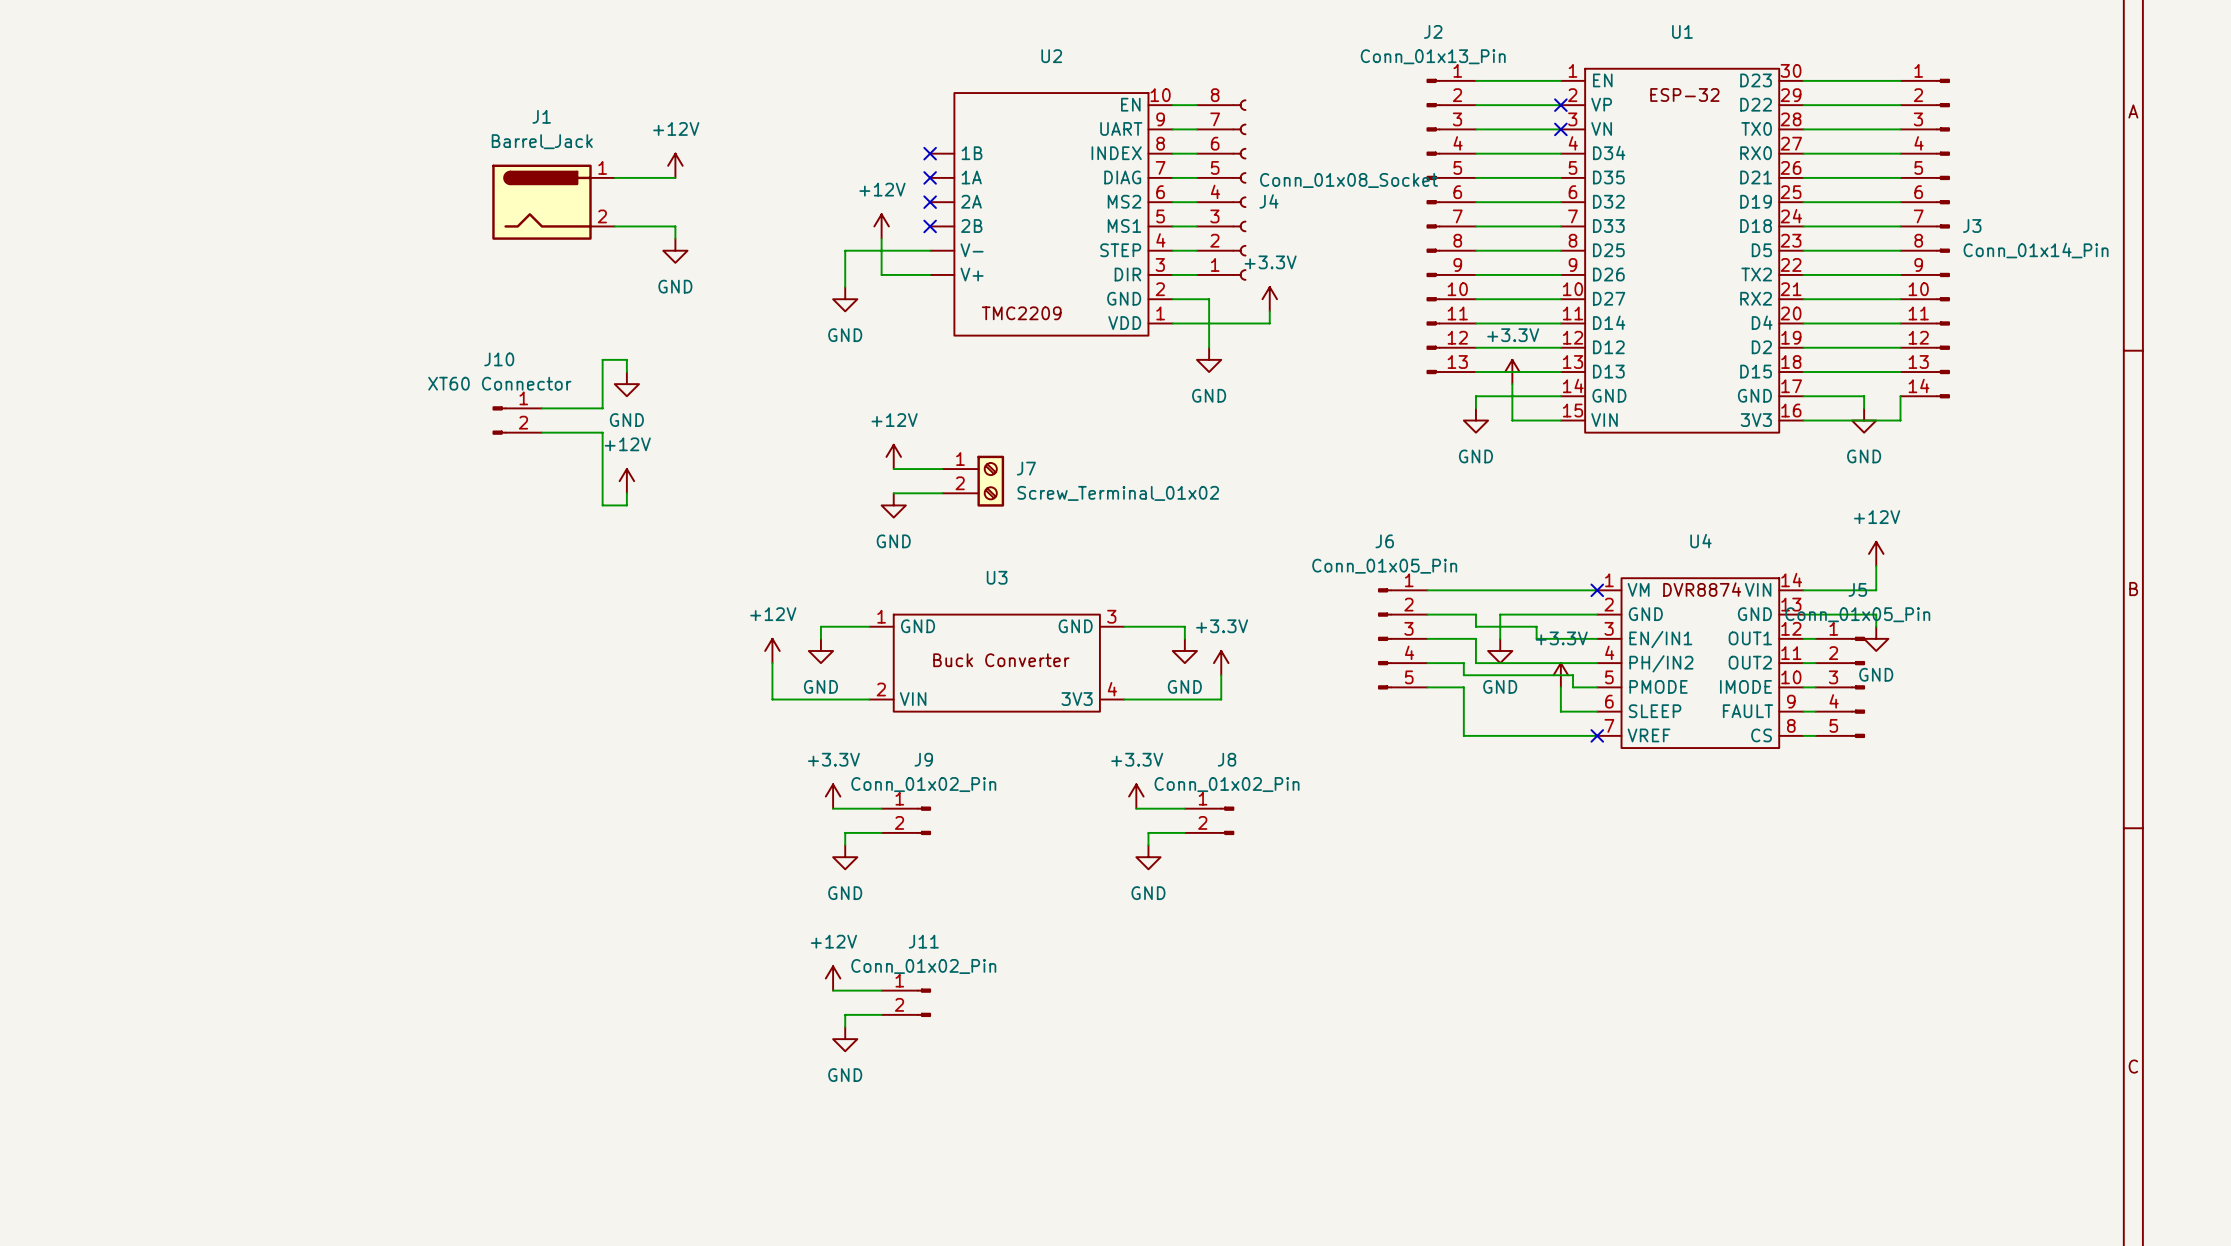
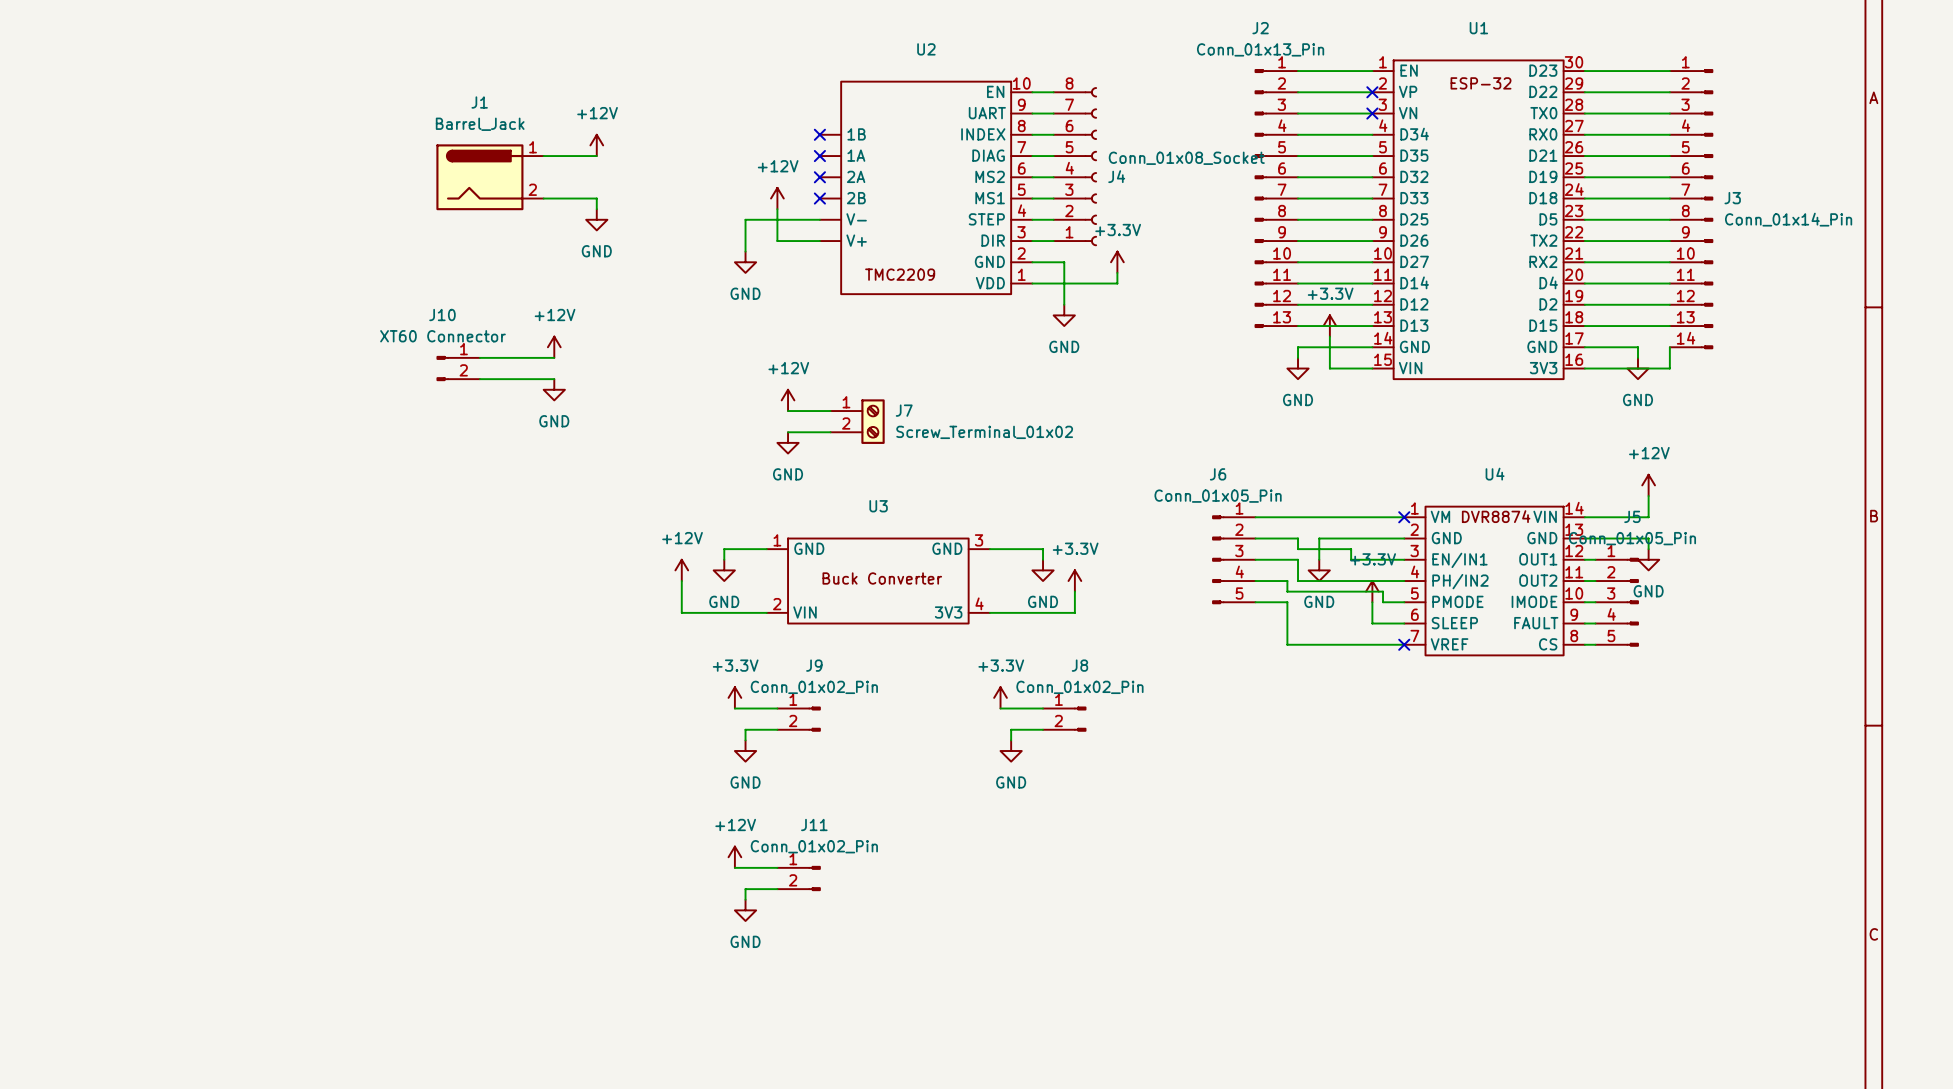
wire: (626, 372) (626, 359) (602, 359) (602, 408) -> (554, 357) (533, 357)
power symbol position: GND (626, 384) -> GND (554, 389)
wire: (602, 432) (602, 505) (626, 505) (626, 493) -> (533, 379) (554, 379)
power symbol position: +12V (626, 481) -> +12V (554, 347)

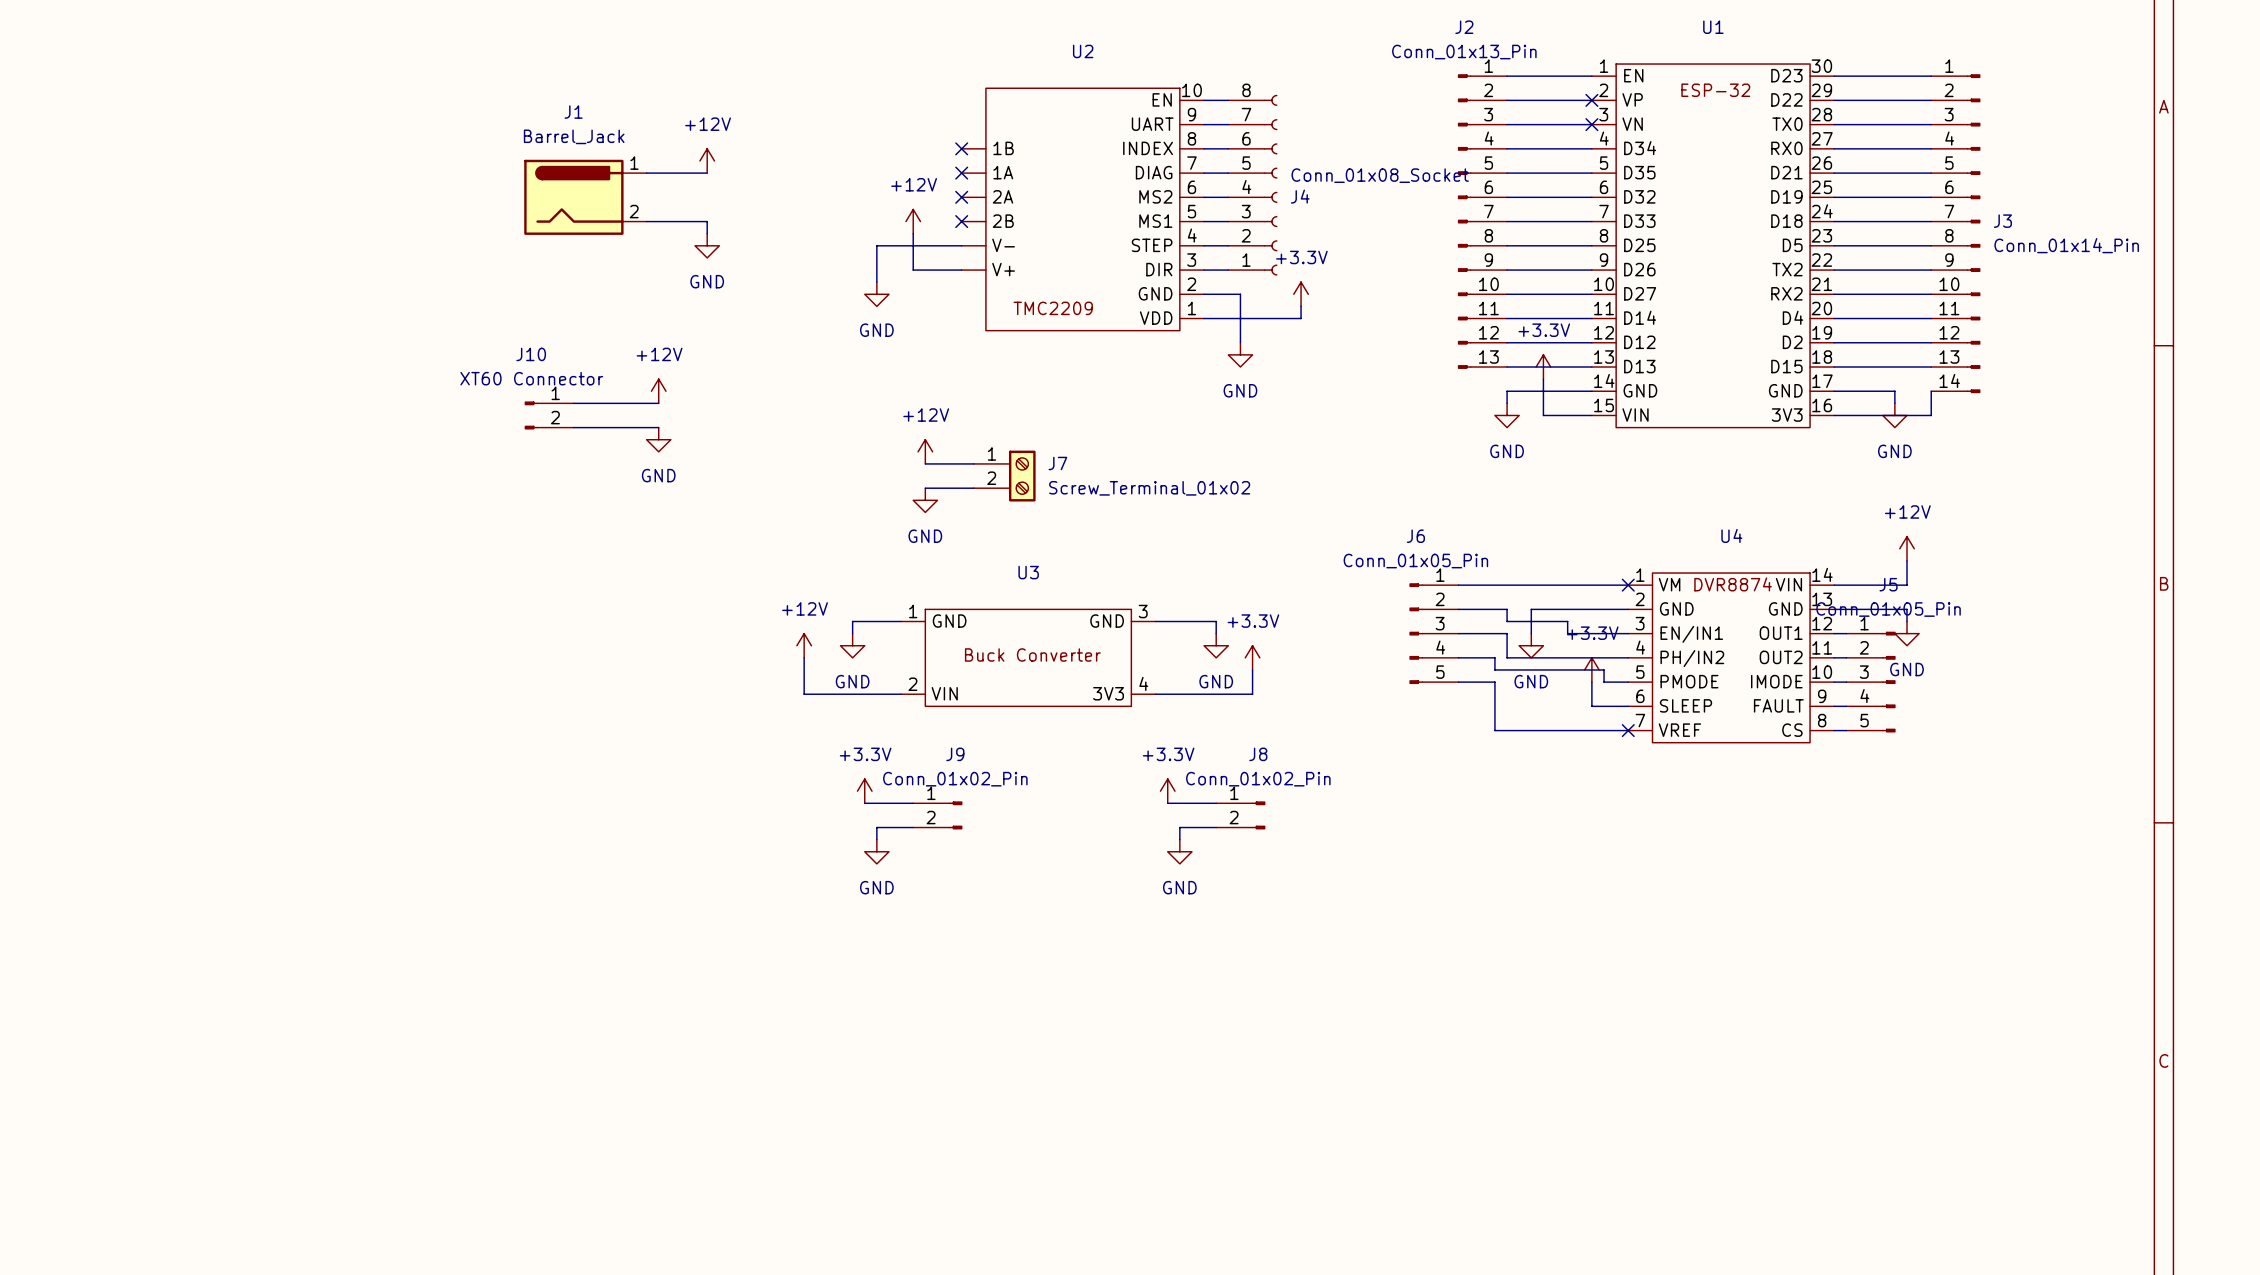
power symbol: +12V (734, 857) -> none
wire: (734, 867) (777, 867) -> none
J11: Conn_01x02_Pin (798, 878) -> none
wire: (777, 889) (745, 889) (745, 899) -> none
power symbol: GND (745, 910) -> none

